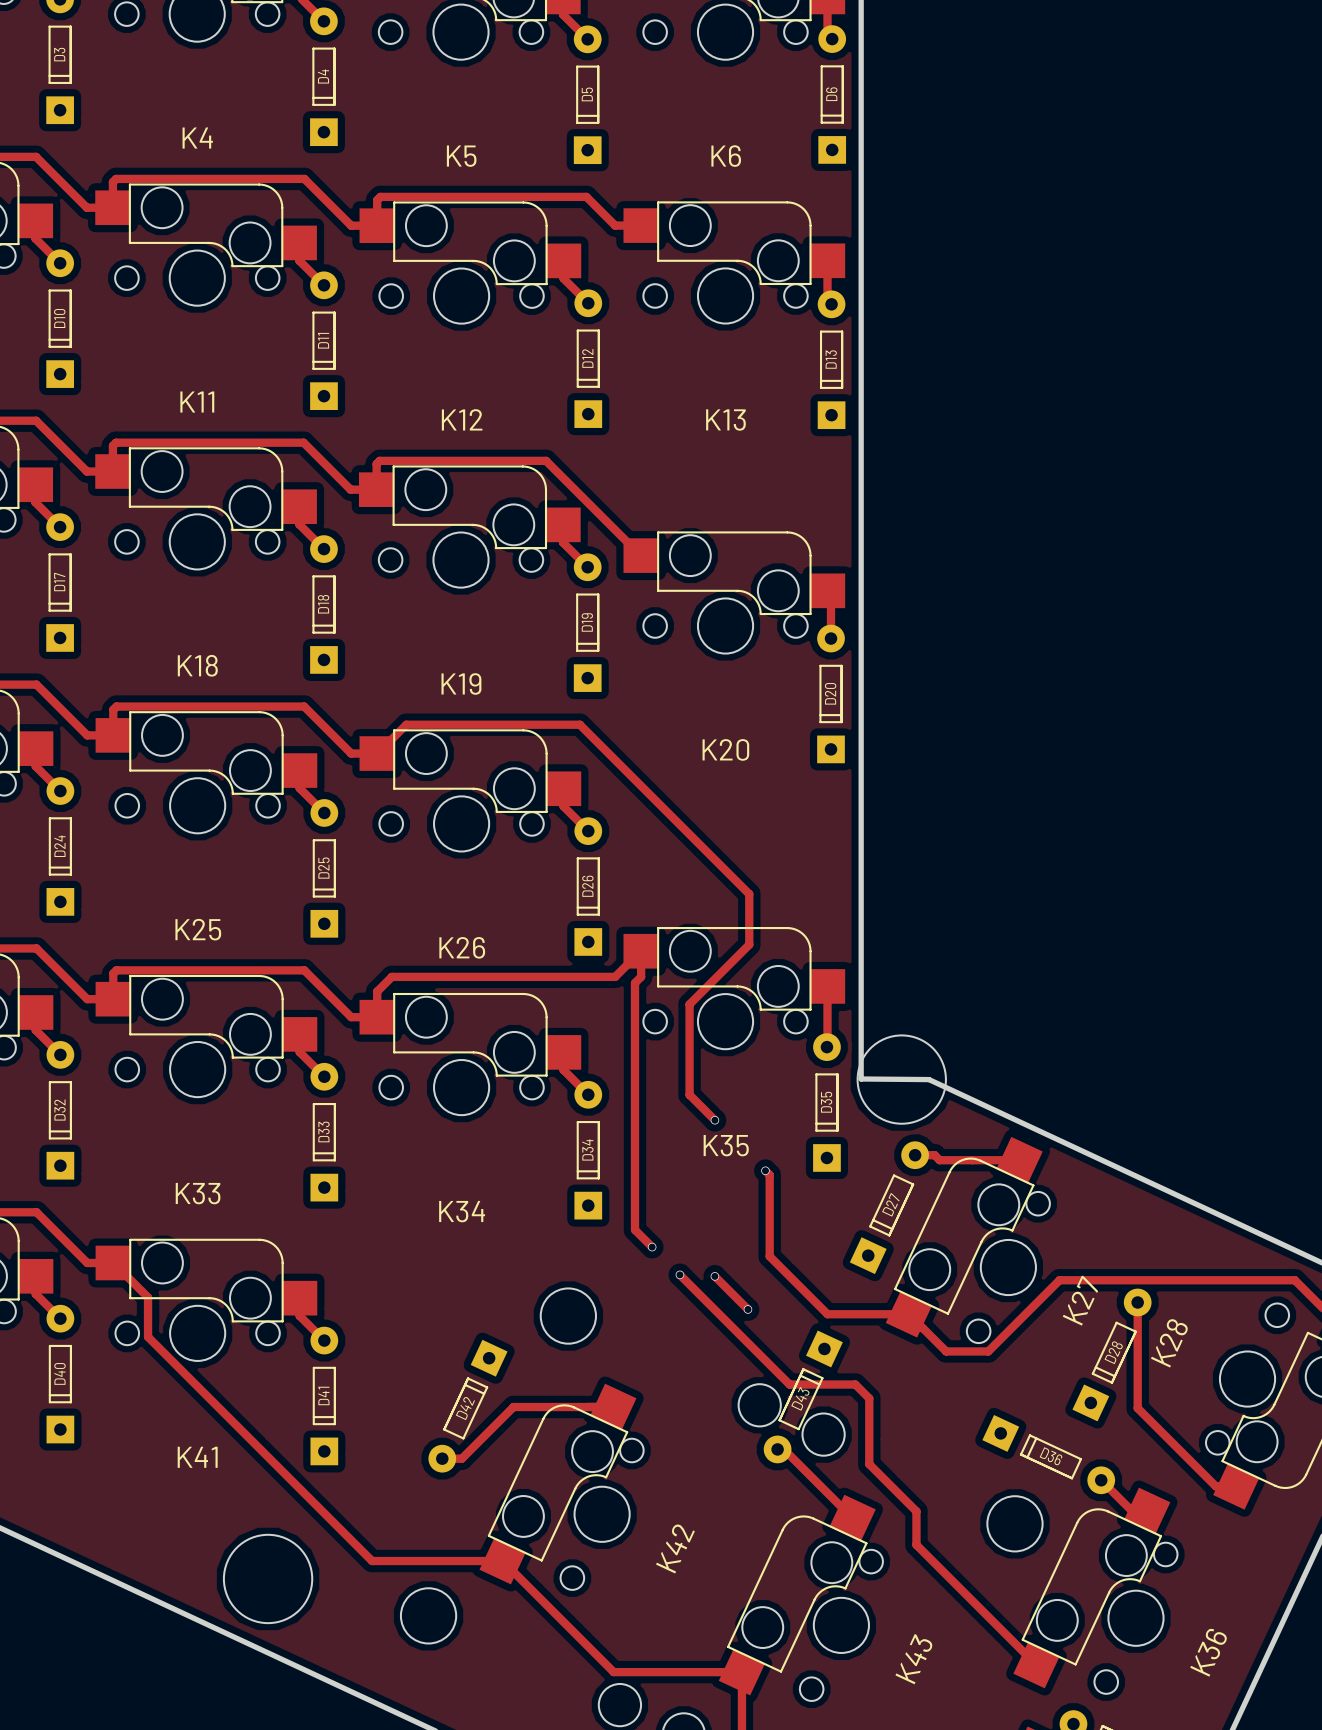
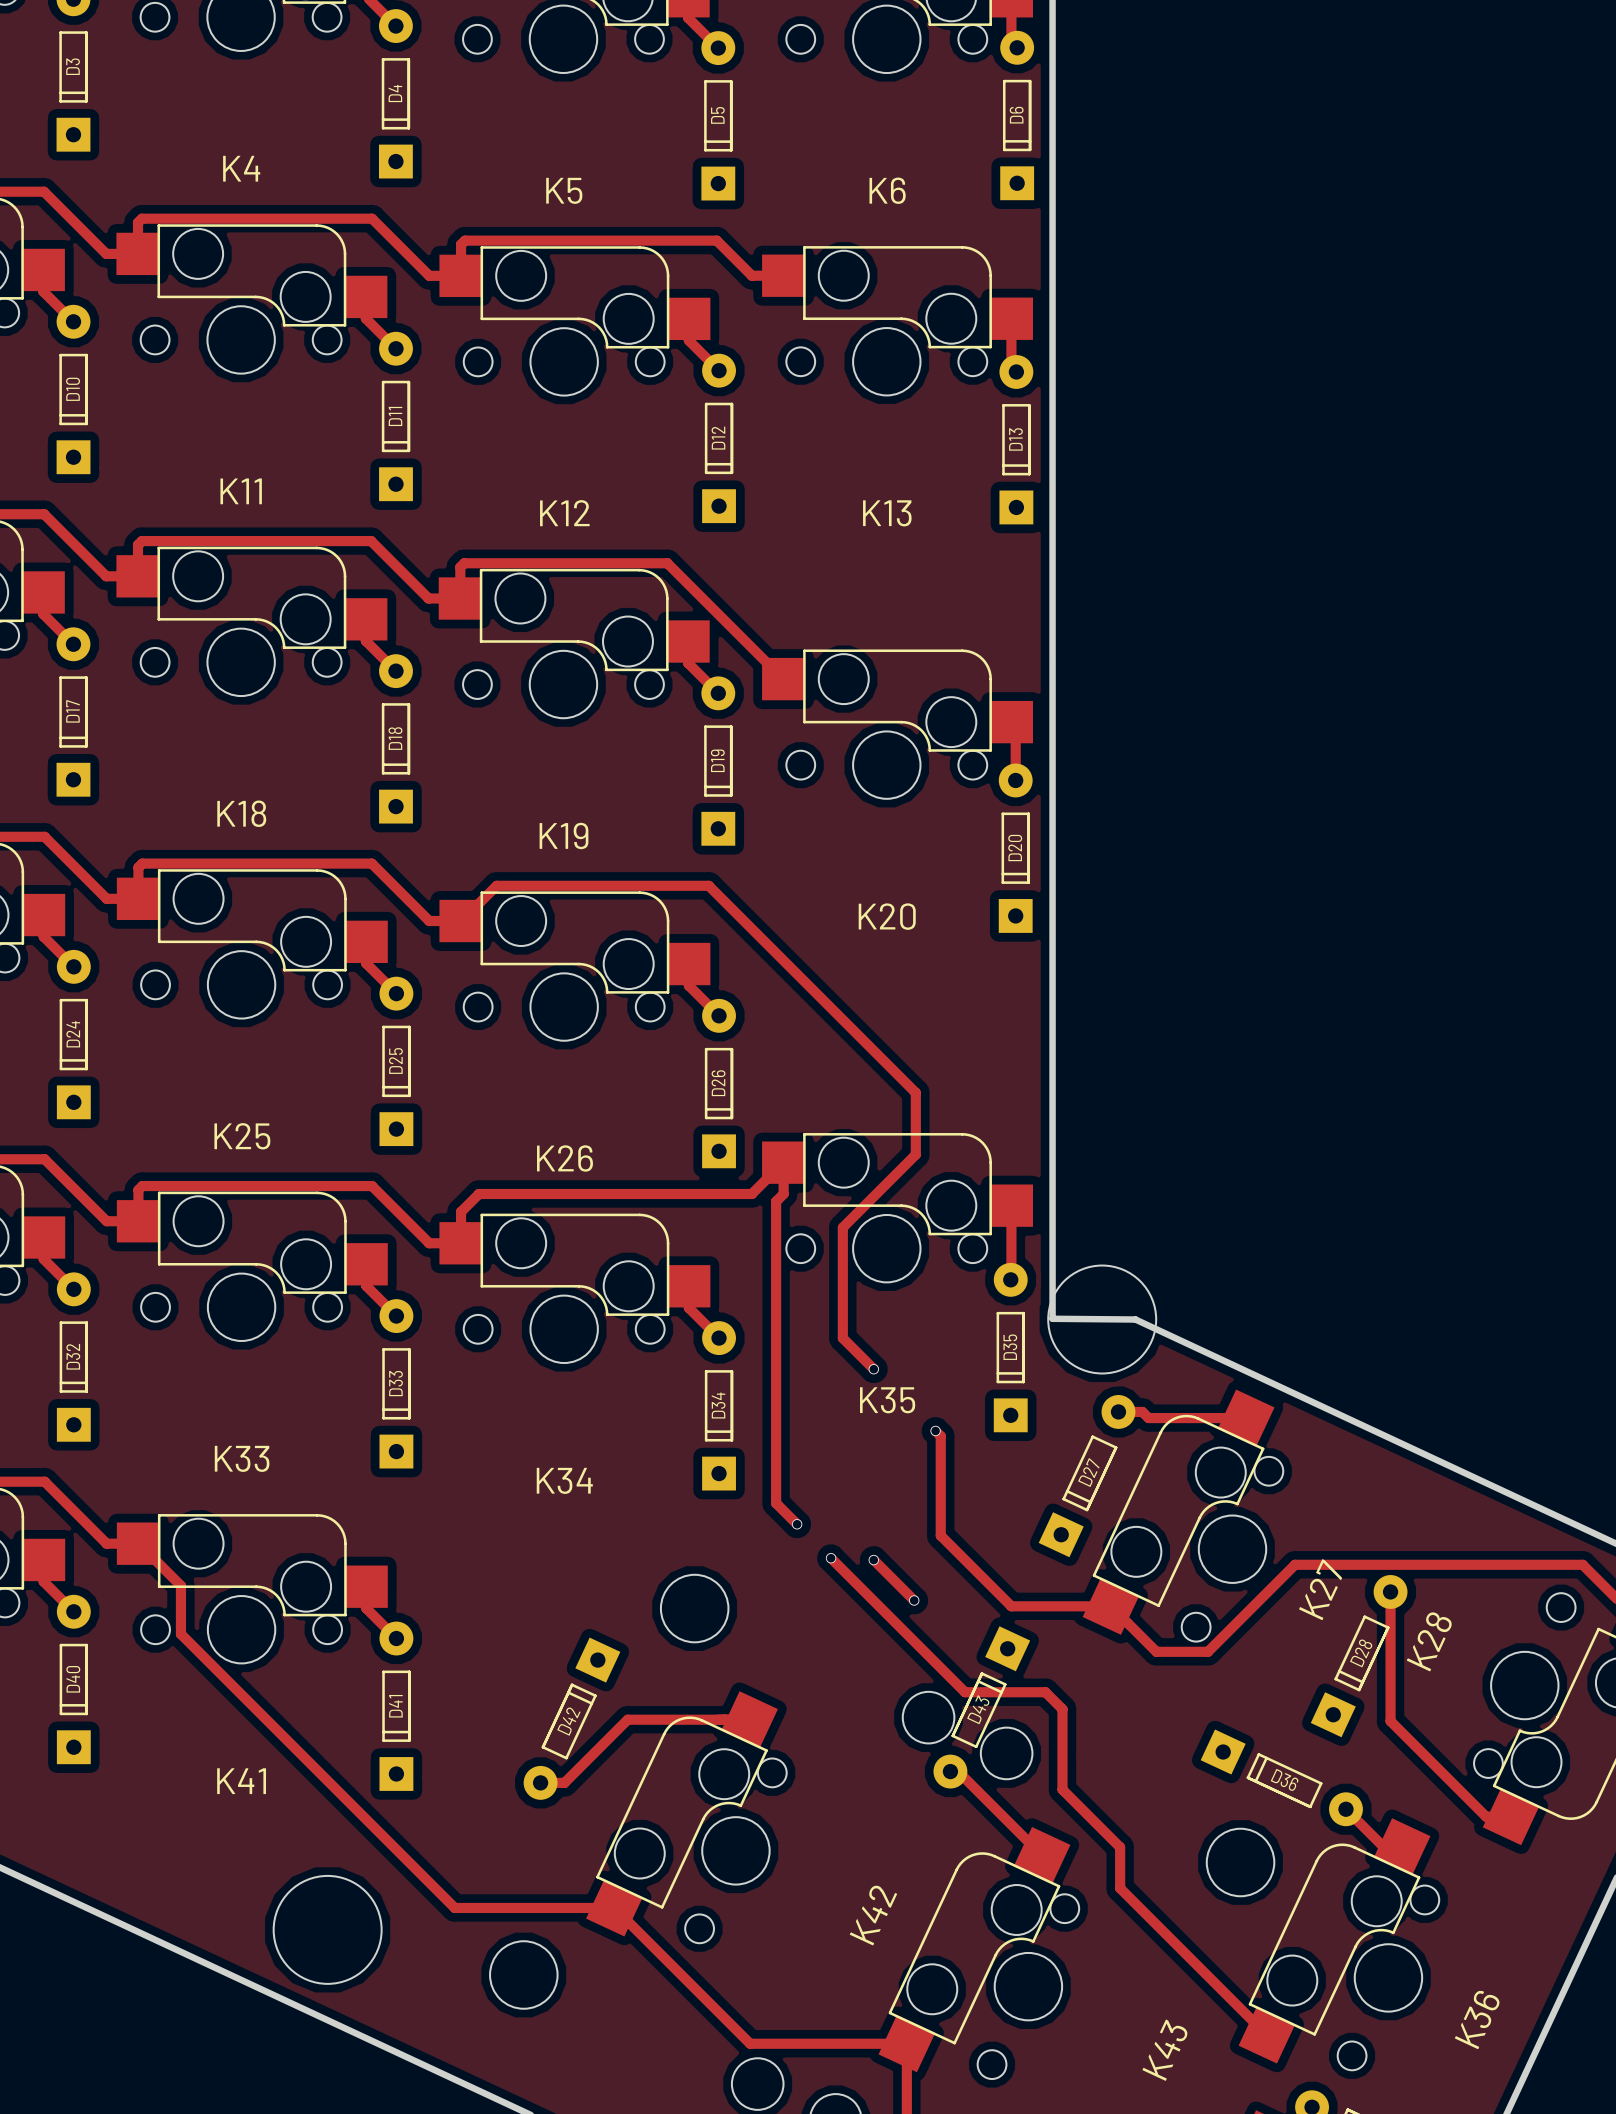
K42 name position: K42 (675, 1548) -> K42 (873, 1915)
K43 name position: K43 (913, 1659) -> K43 (1165, 2050)

